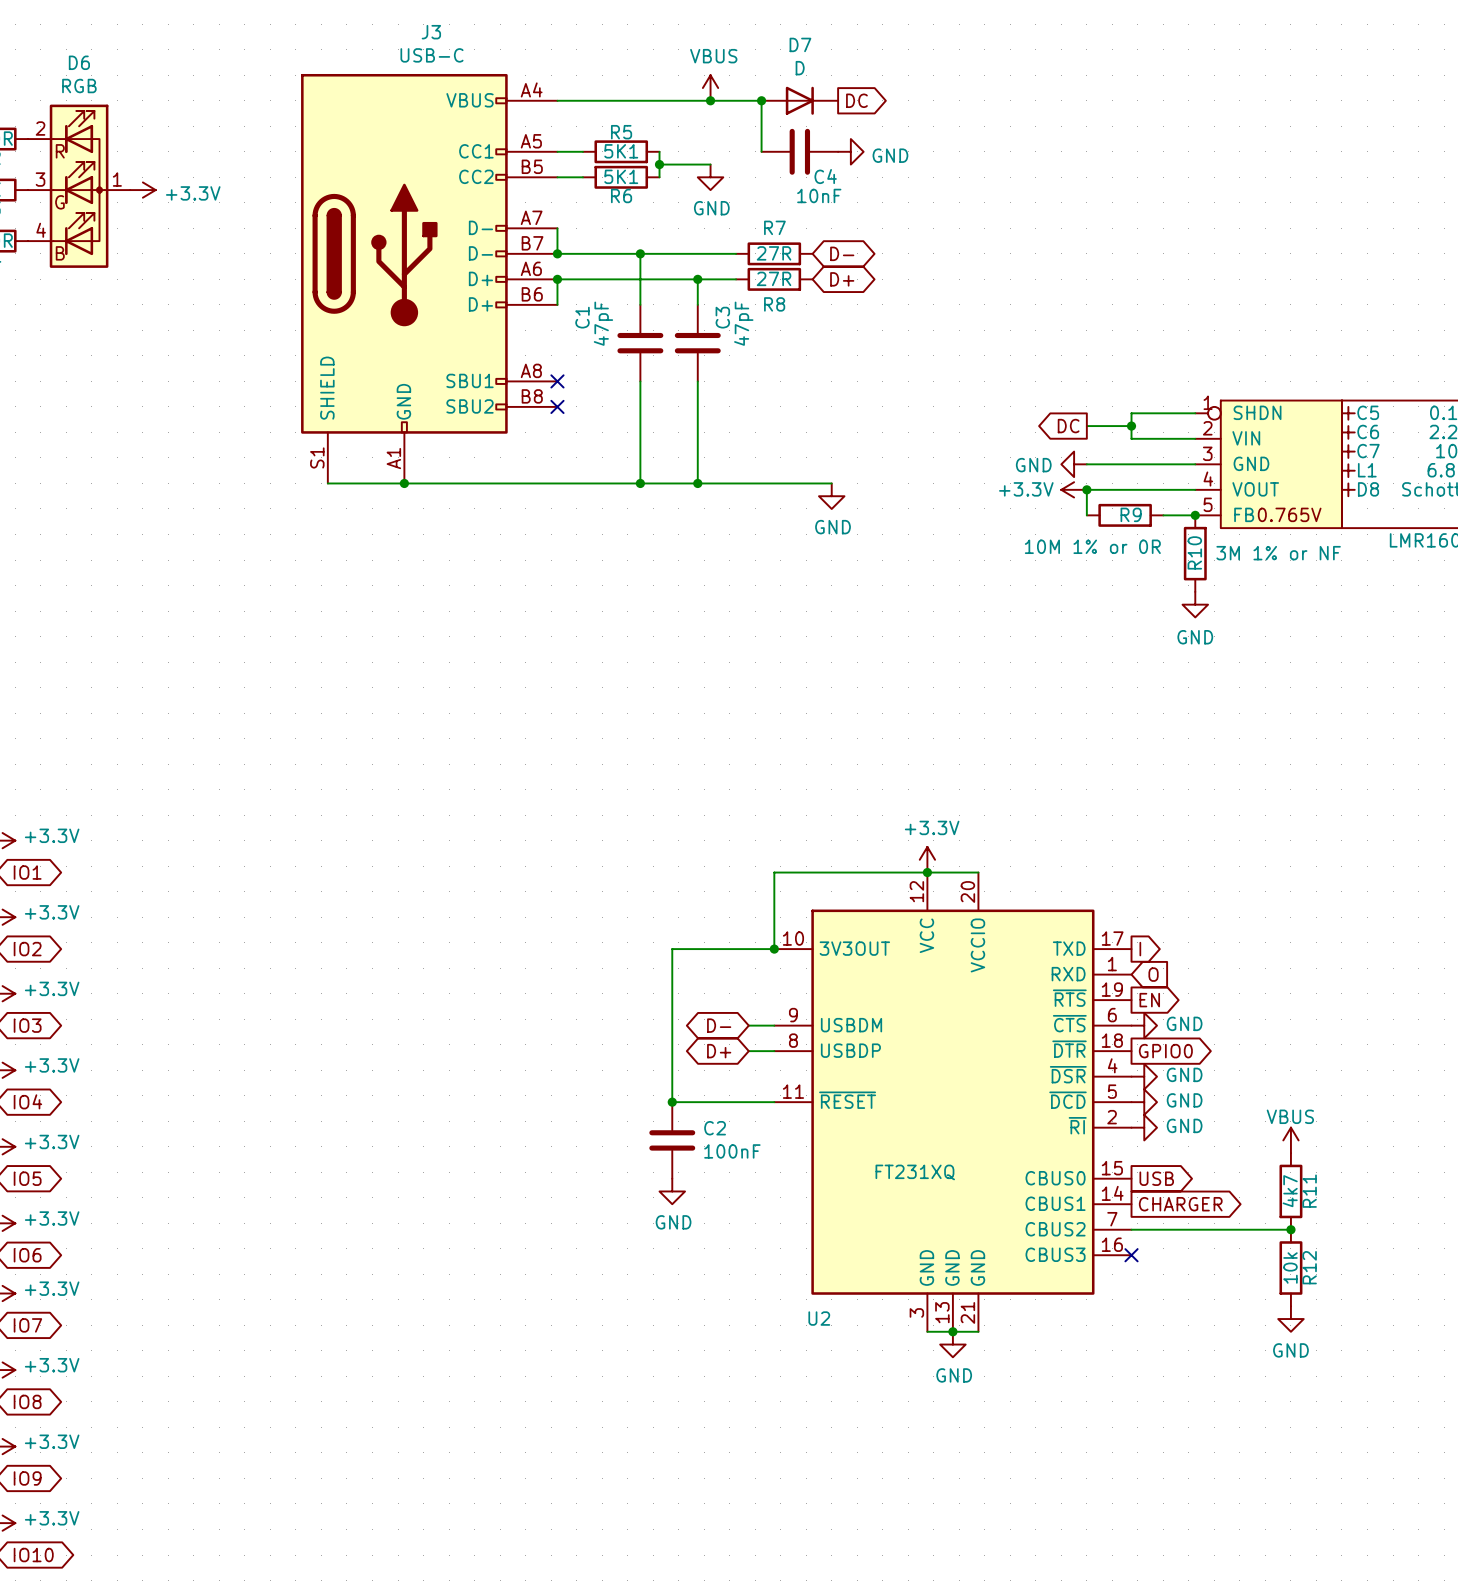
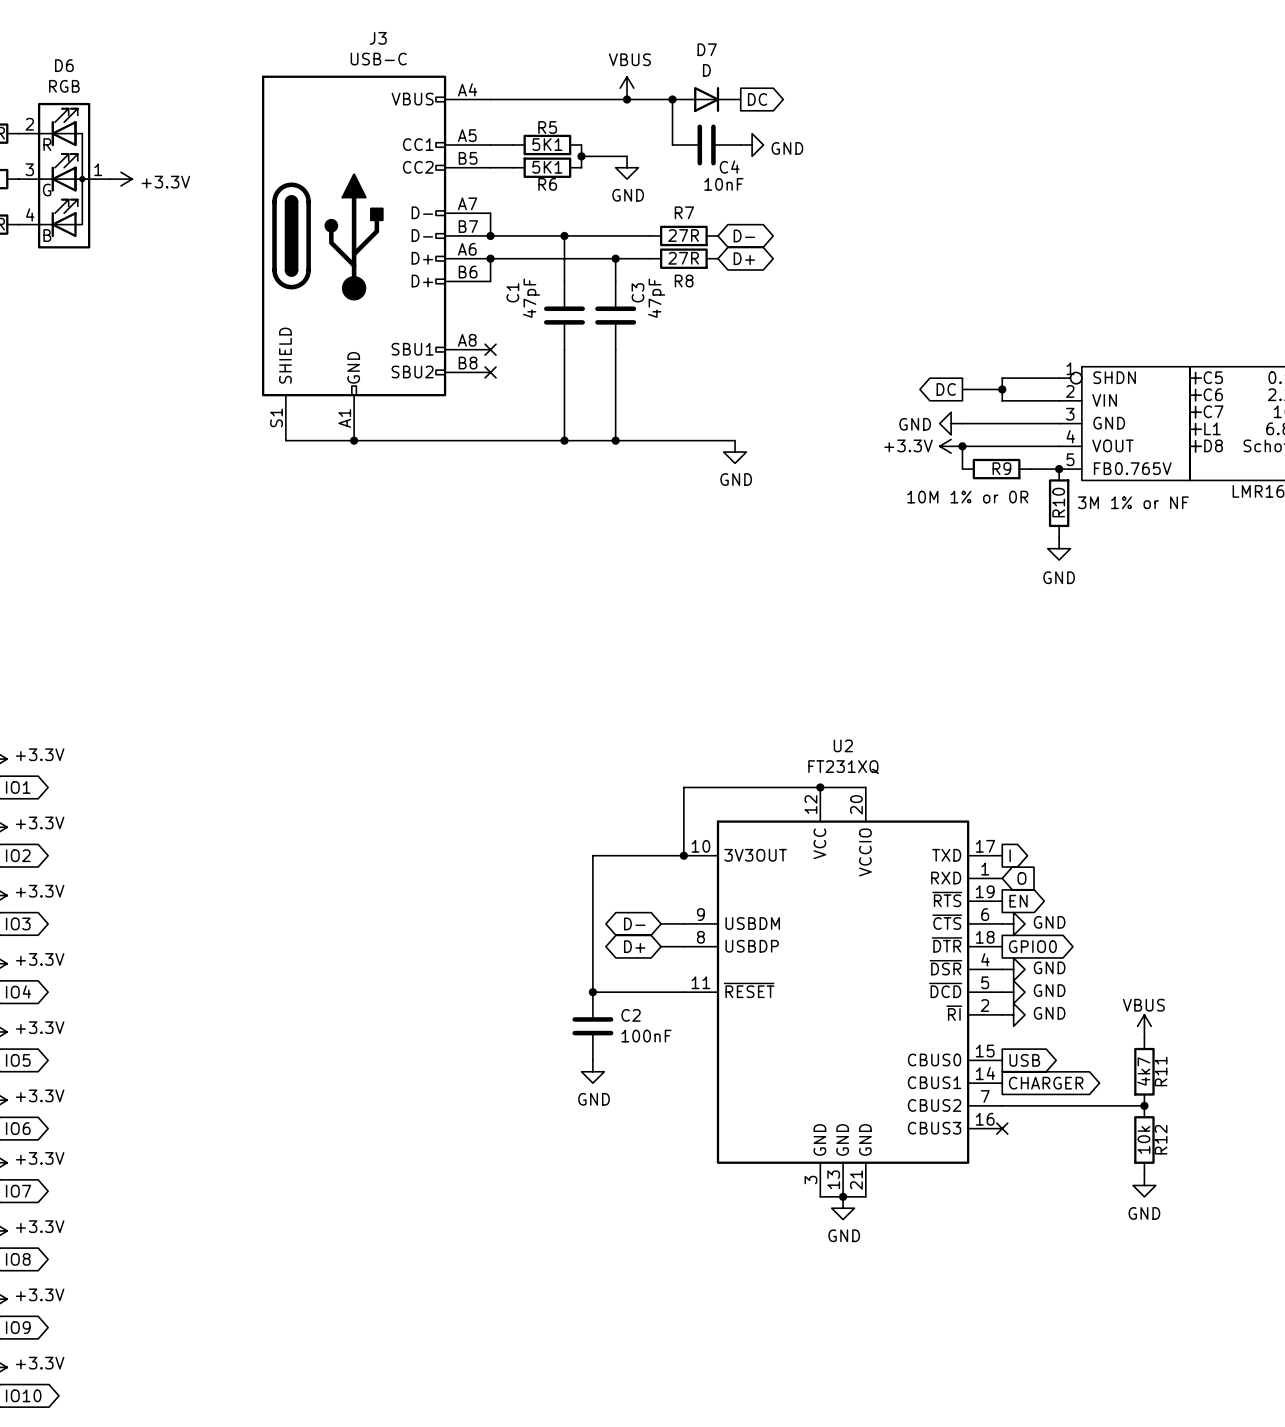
power symbol: +3.3V (927, 859) -> none
U2 value position: FT231XQ (915, 1172) -> FT231XQ (843, 767)
U2 name position: U2 (819, 1318) -> U2 (843, 745)

